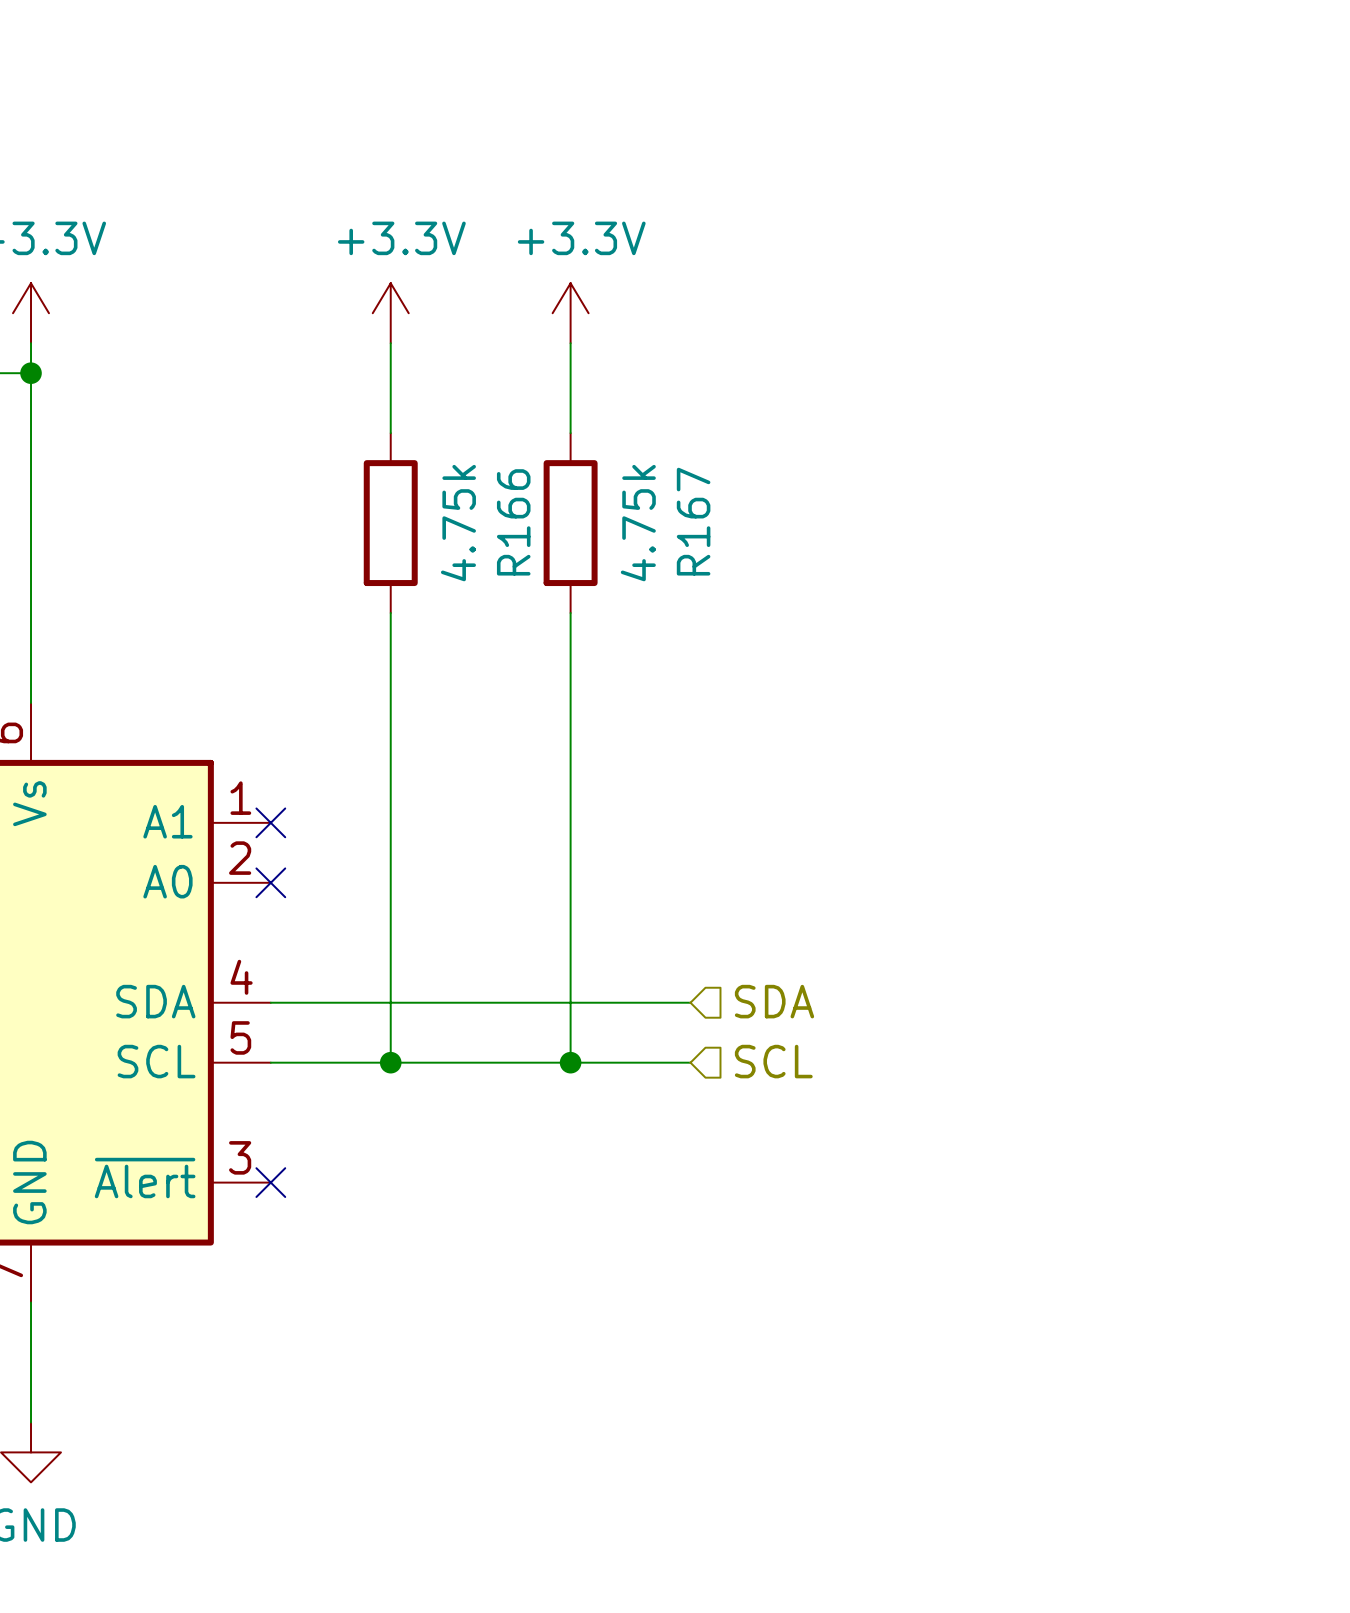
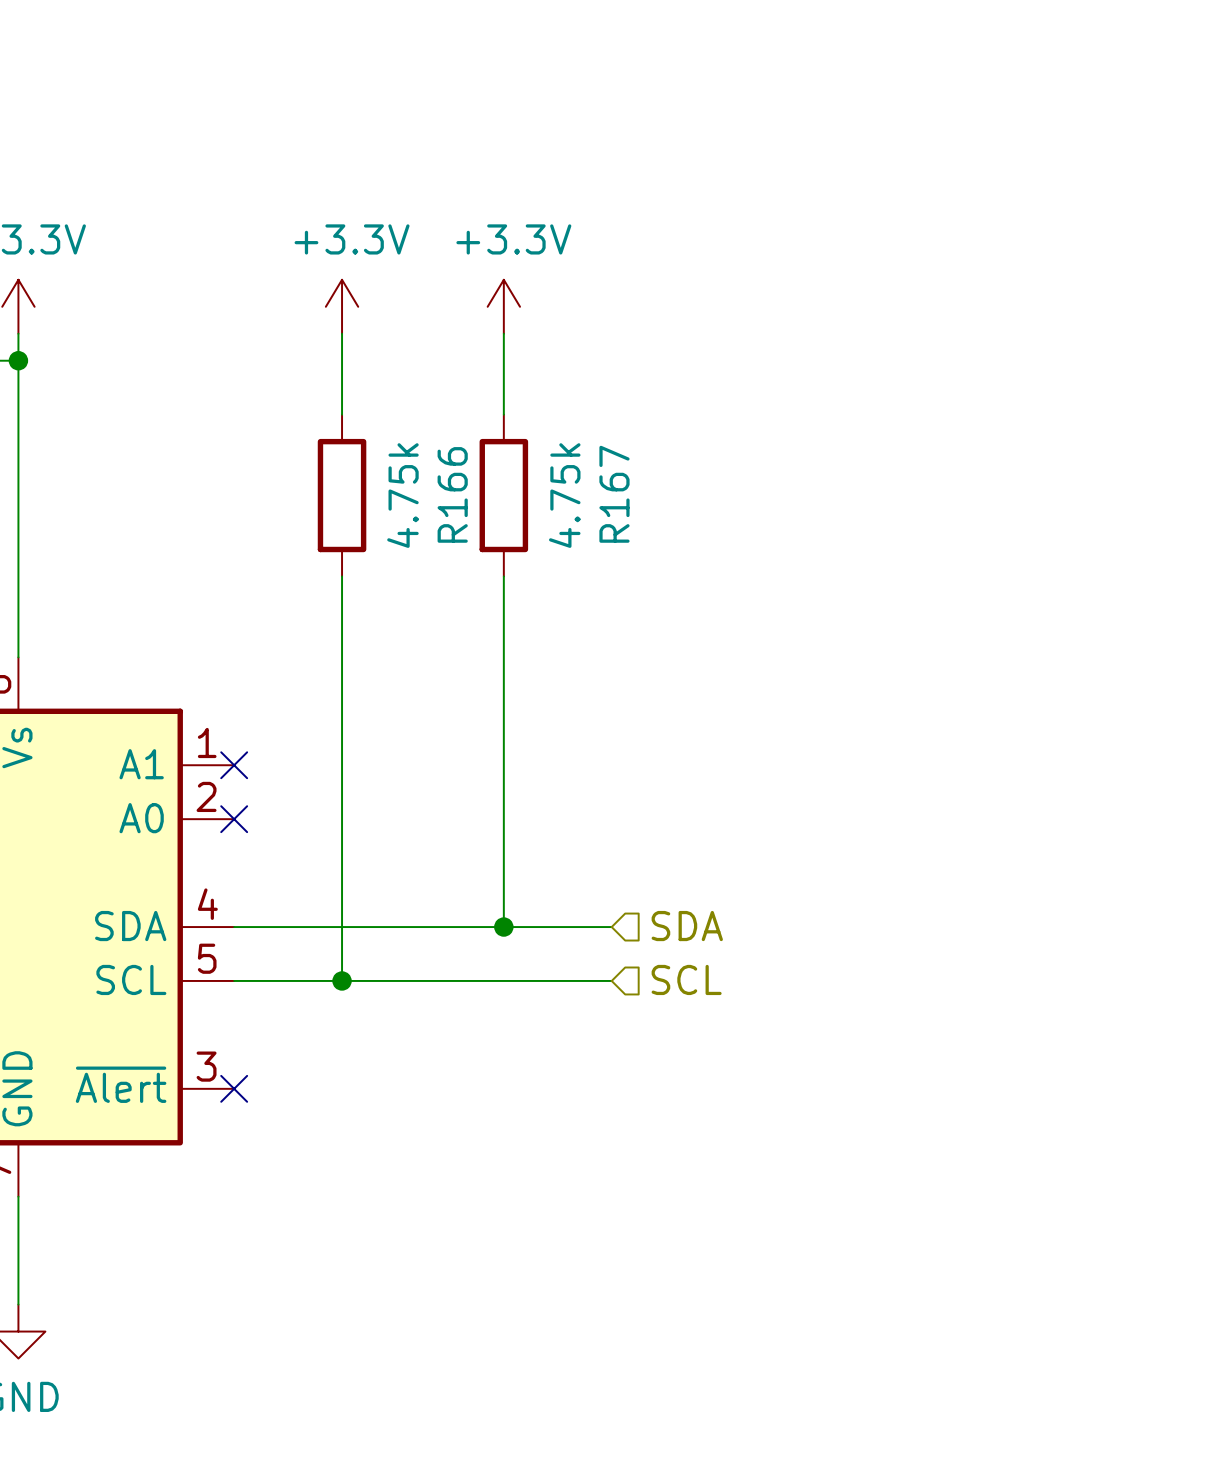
wire: (570, 1002) (570, 1062) -> none
junction position: (570, 1062) -> (503, 927)

